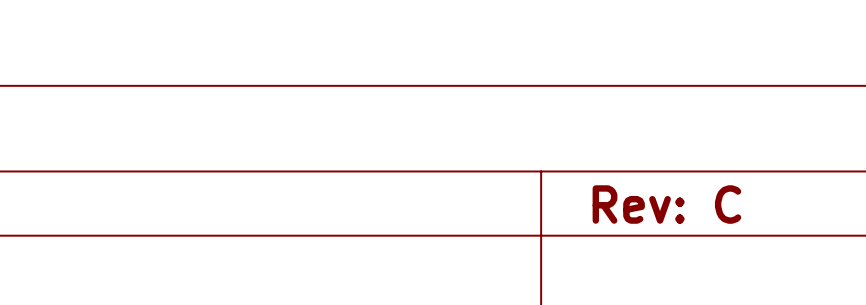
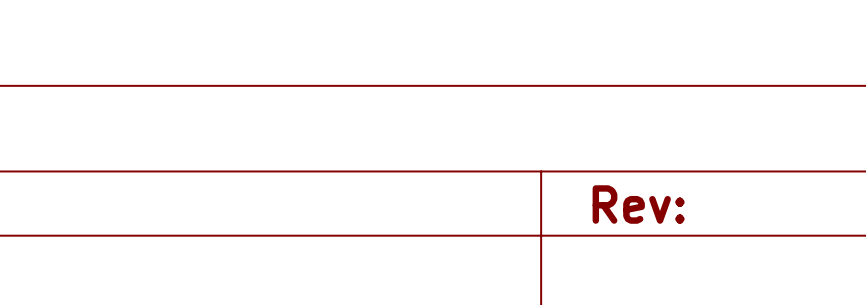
title block: Rev: C (666, 204) -> Rev: (638, 204)

